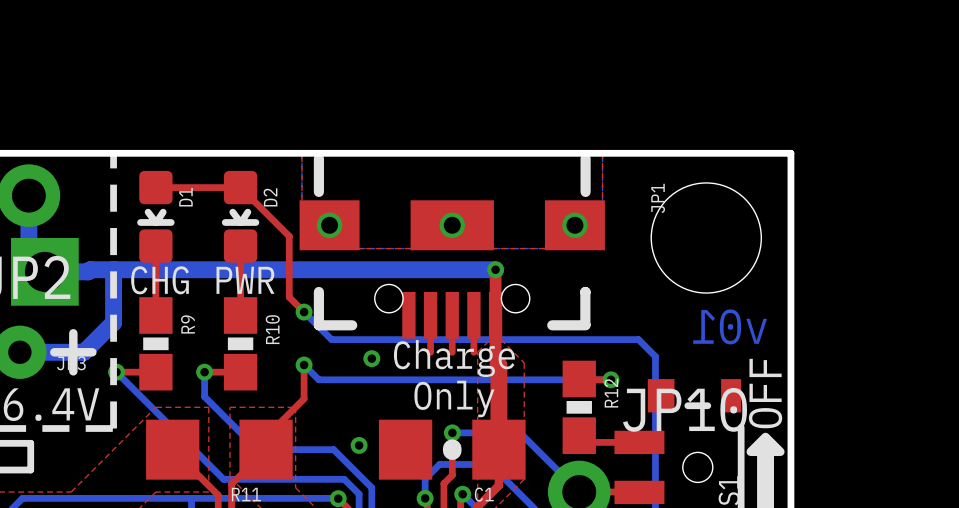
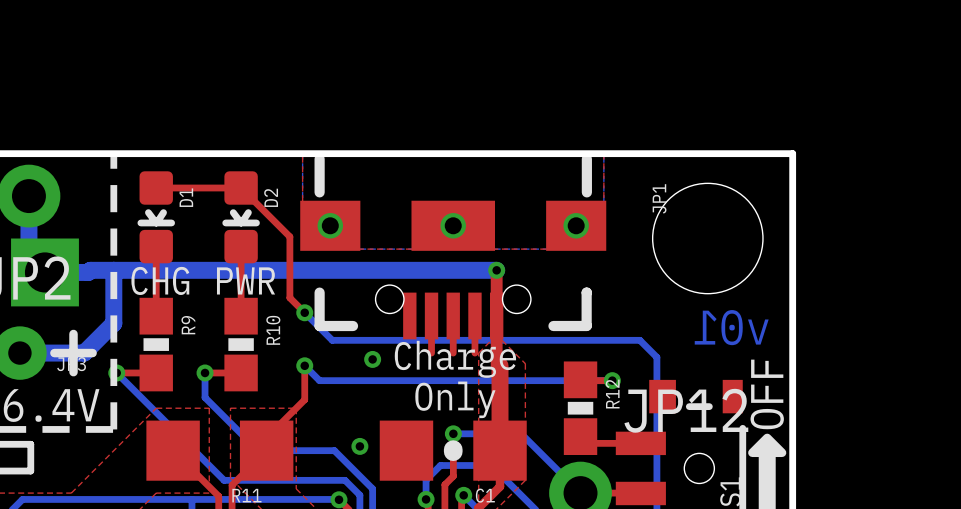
JP10 name: JP10 (685, 409) -> JP12 (686, 410)

